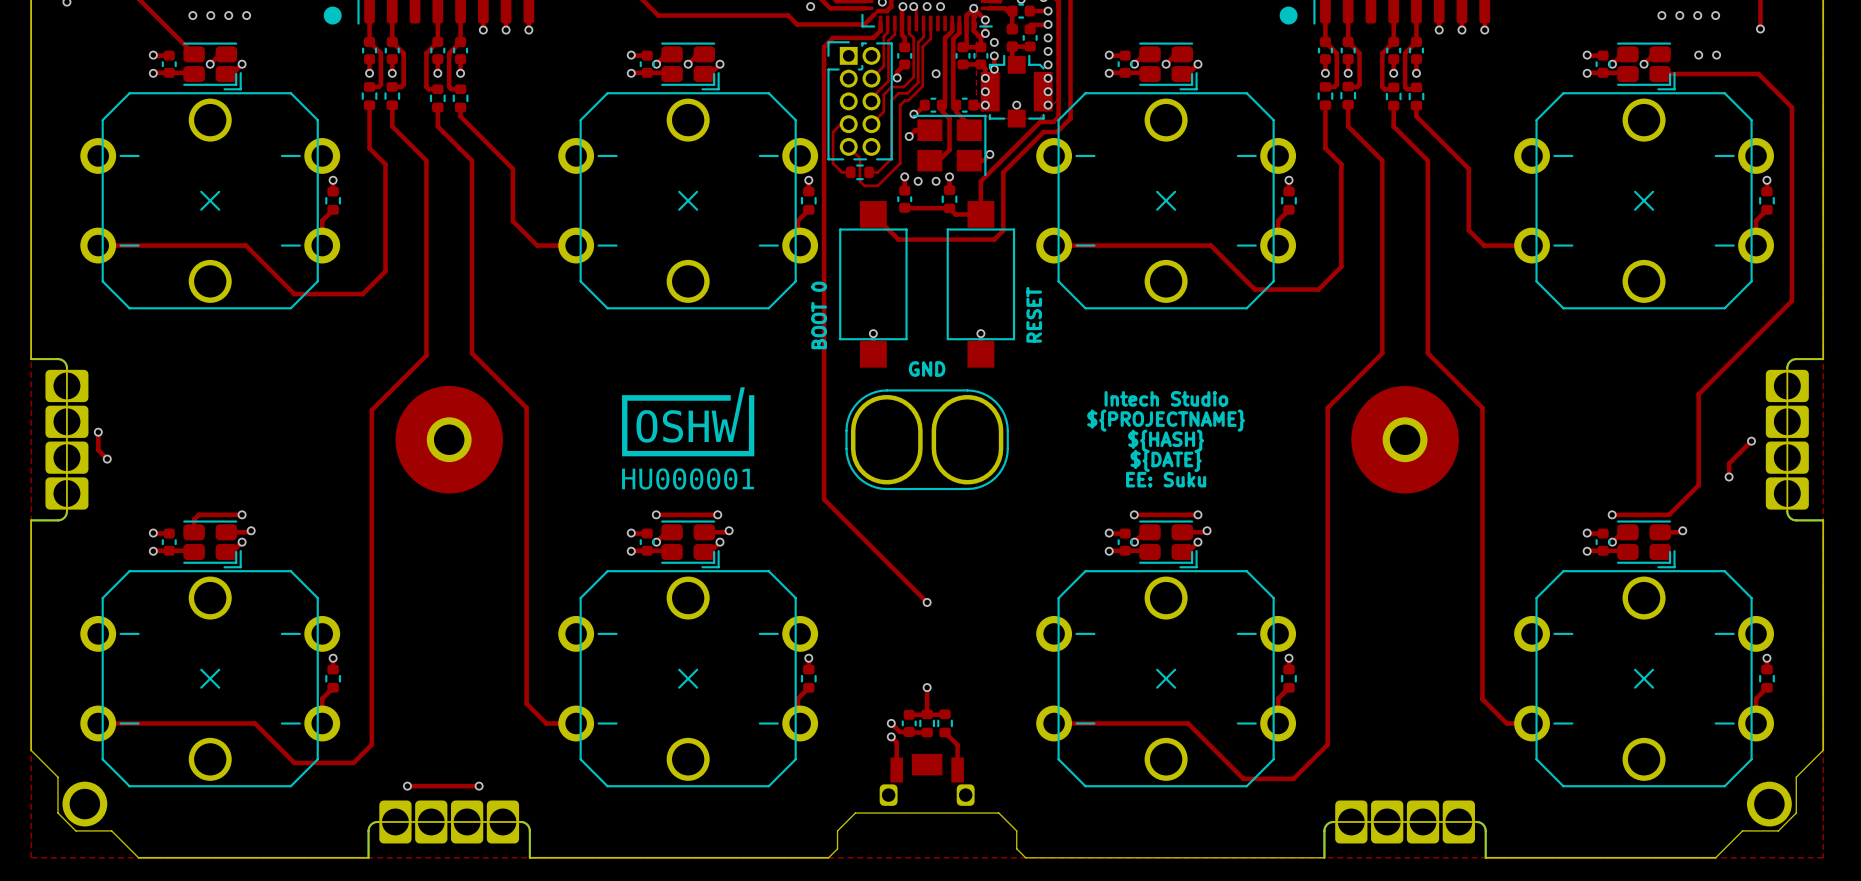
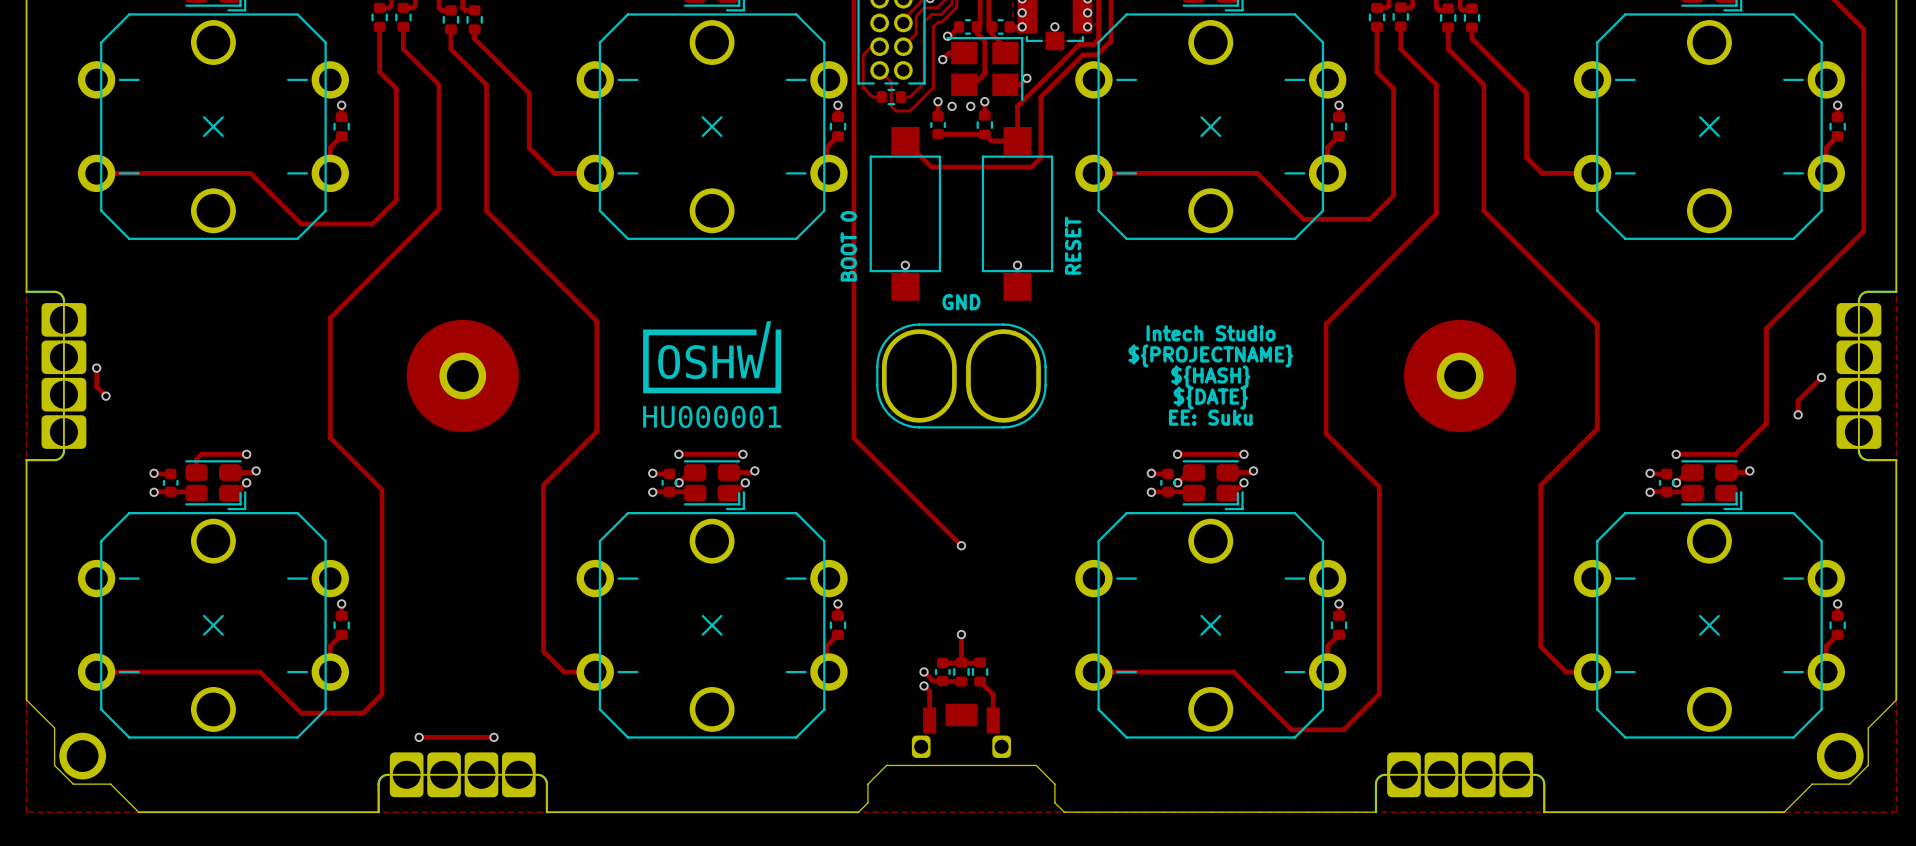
track: (426, 279) (426, 355) (371, 410) (371, 548) -> (439, 209) (330, 317) (330, 438) (382, 489)
track: (471, 281) (471, 353) (526, 407) (526, 544) -> (486, 211) (596, 321) (596, 431) (543, 484)
track: (1427, 281) (1427, 353) (1482, 407) (1482, 544) -> (1483, 210) (1597, 324) (1597, 428) (1540, 485)
track: (1382, 284) (1382, 353) (1327, 407) (1327, 546) -> (1436, 213) (1326, 324) (1326, 433) (1379, 486)

